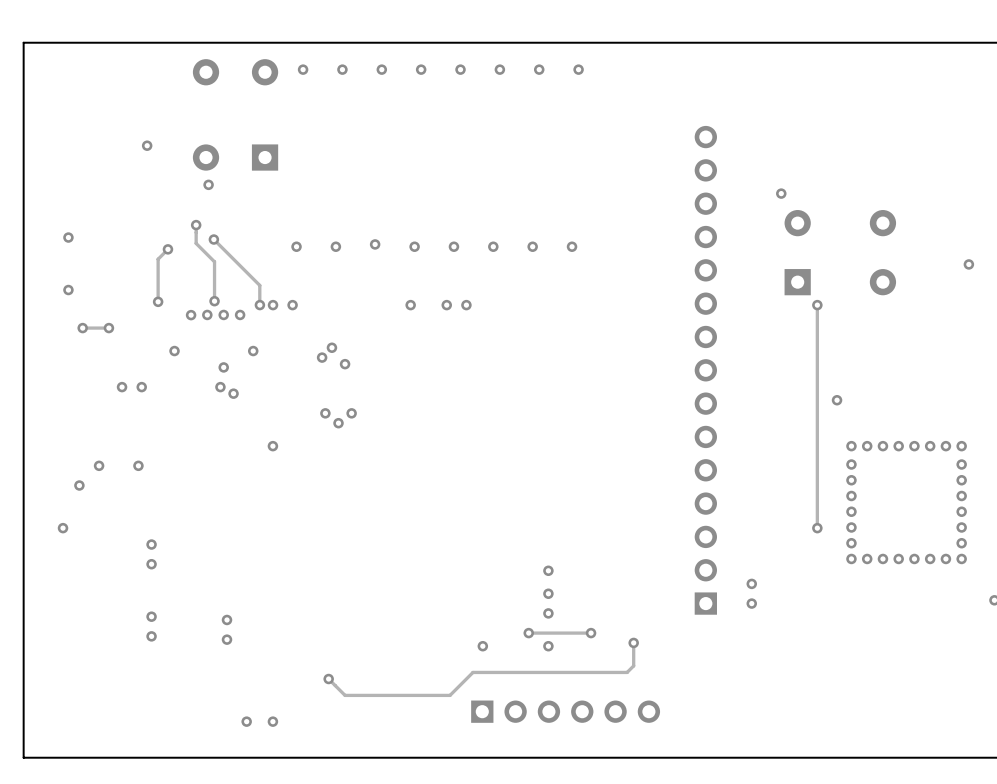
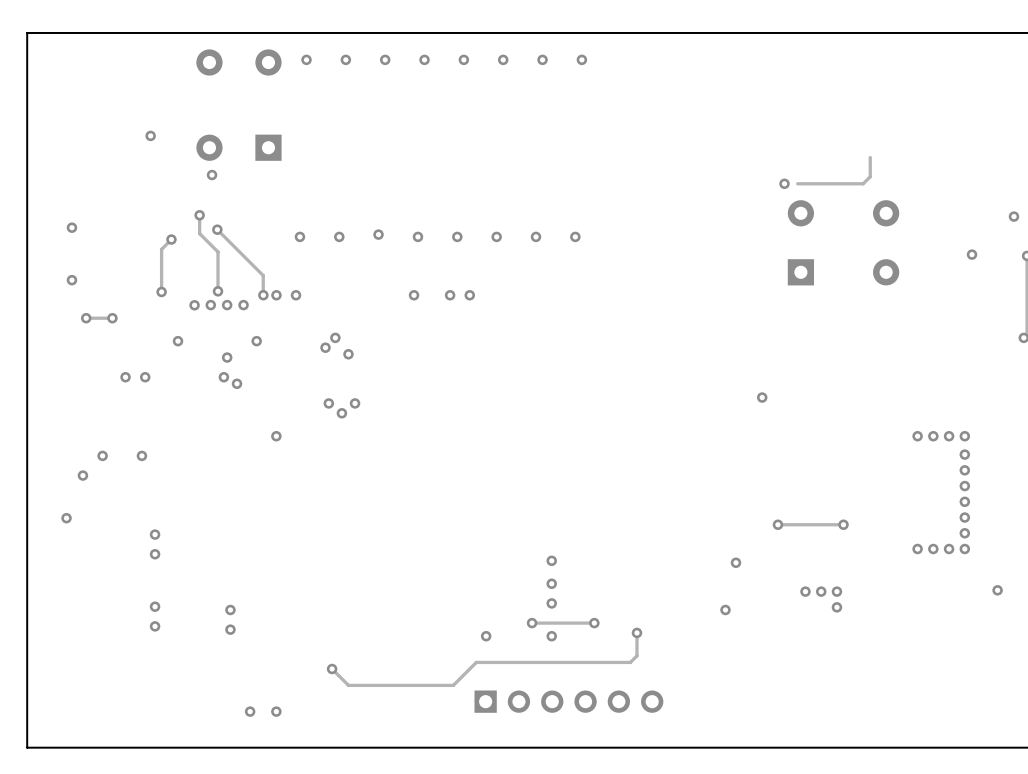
track: none -> (870, 157) (870, 176) (863, 183) (797, 183)
track: (817, 305) (817, 528) -> none
via: (817, 305) -> none
part: (705, 370) -> none
via: (837, 400) -> none
via: none -> (762, 397)
via: (851, 446) -> none
via: (867, 446) -> none
via: (882, 446) -> none
via: (898, 446) -> none
via: (851, 464) -> none
via: (851, 480) -> none
via: (851, 496) -> none
via: (851, 511) -> none
via: (851, 527) -> none
via: (817, 528) -> none
via: none -> (777, 524)
track: none -> (843, 524) (777, 524)
via: none -> (843, 524)
via: (851, 543) -> none
via: (851, 558) -> none
via: (867, 558) -> none
via: (882, 558) -> none
via: (898, 558) -> none
via: none -> (735, 562)
via: (751, 583) -> none
via: none -> (805, 591)
via: none -> (821, 591)
via: none -> (836, 591)
via: (751, 603) -> none
via: none -> (836, 607)
via: none -> (725, 609)

